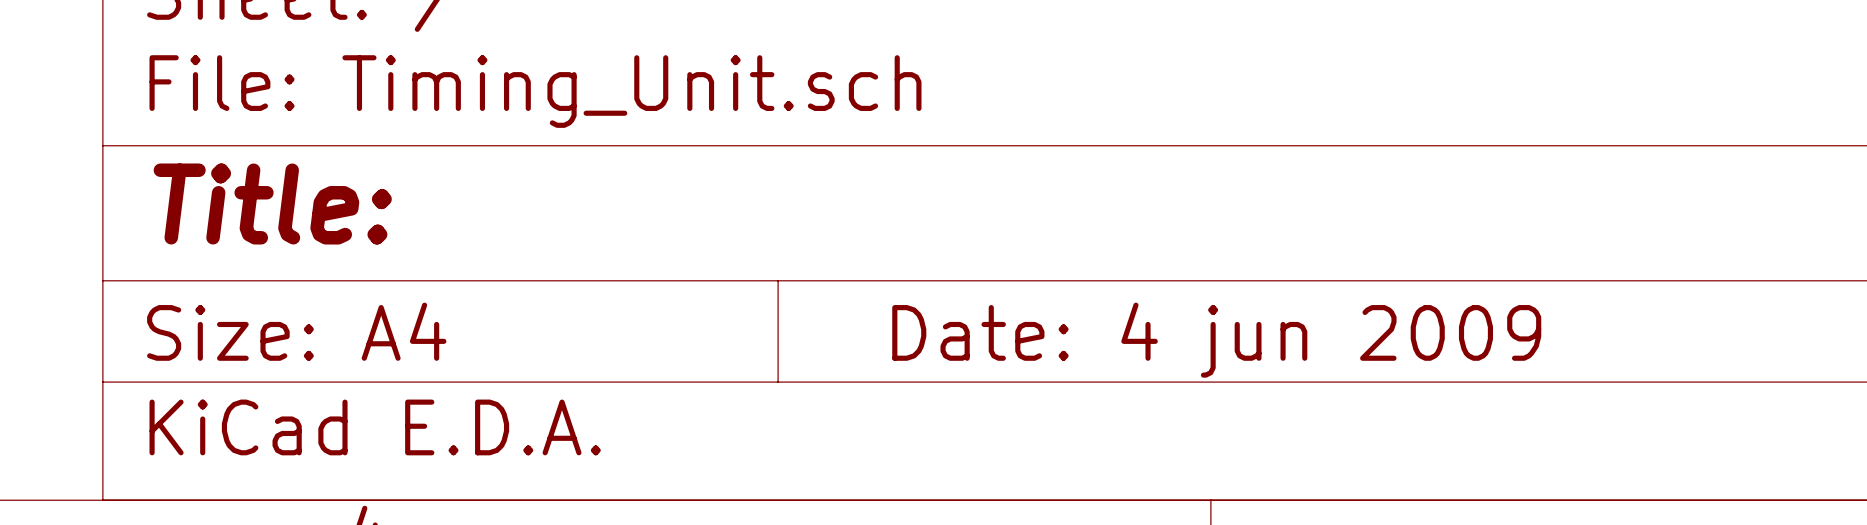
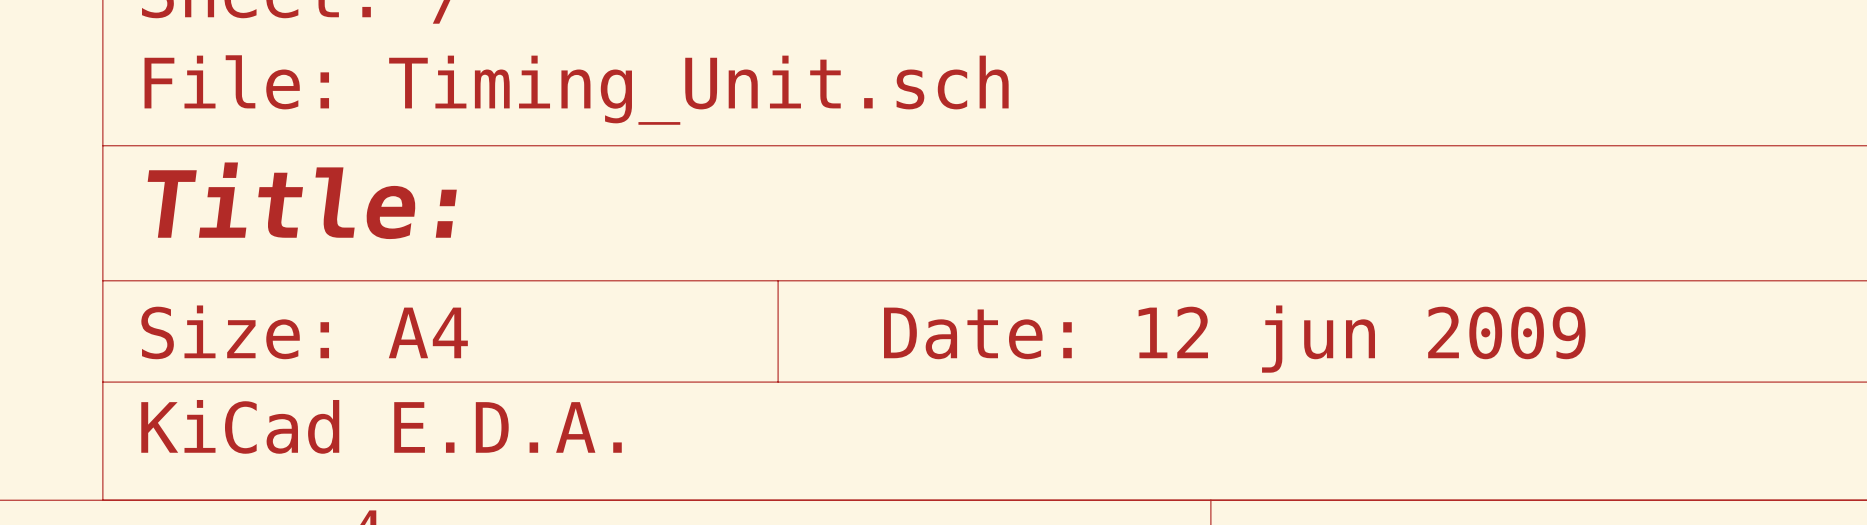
title block: Date: 4 jun 2009 (1216, 340) -> Date: 12 jun 2009 (1234, 339)

